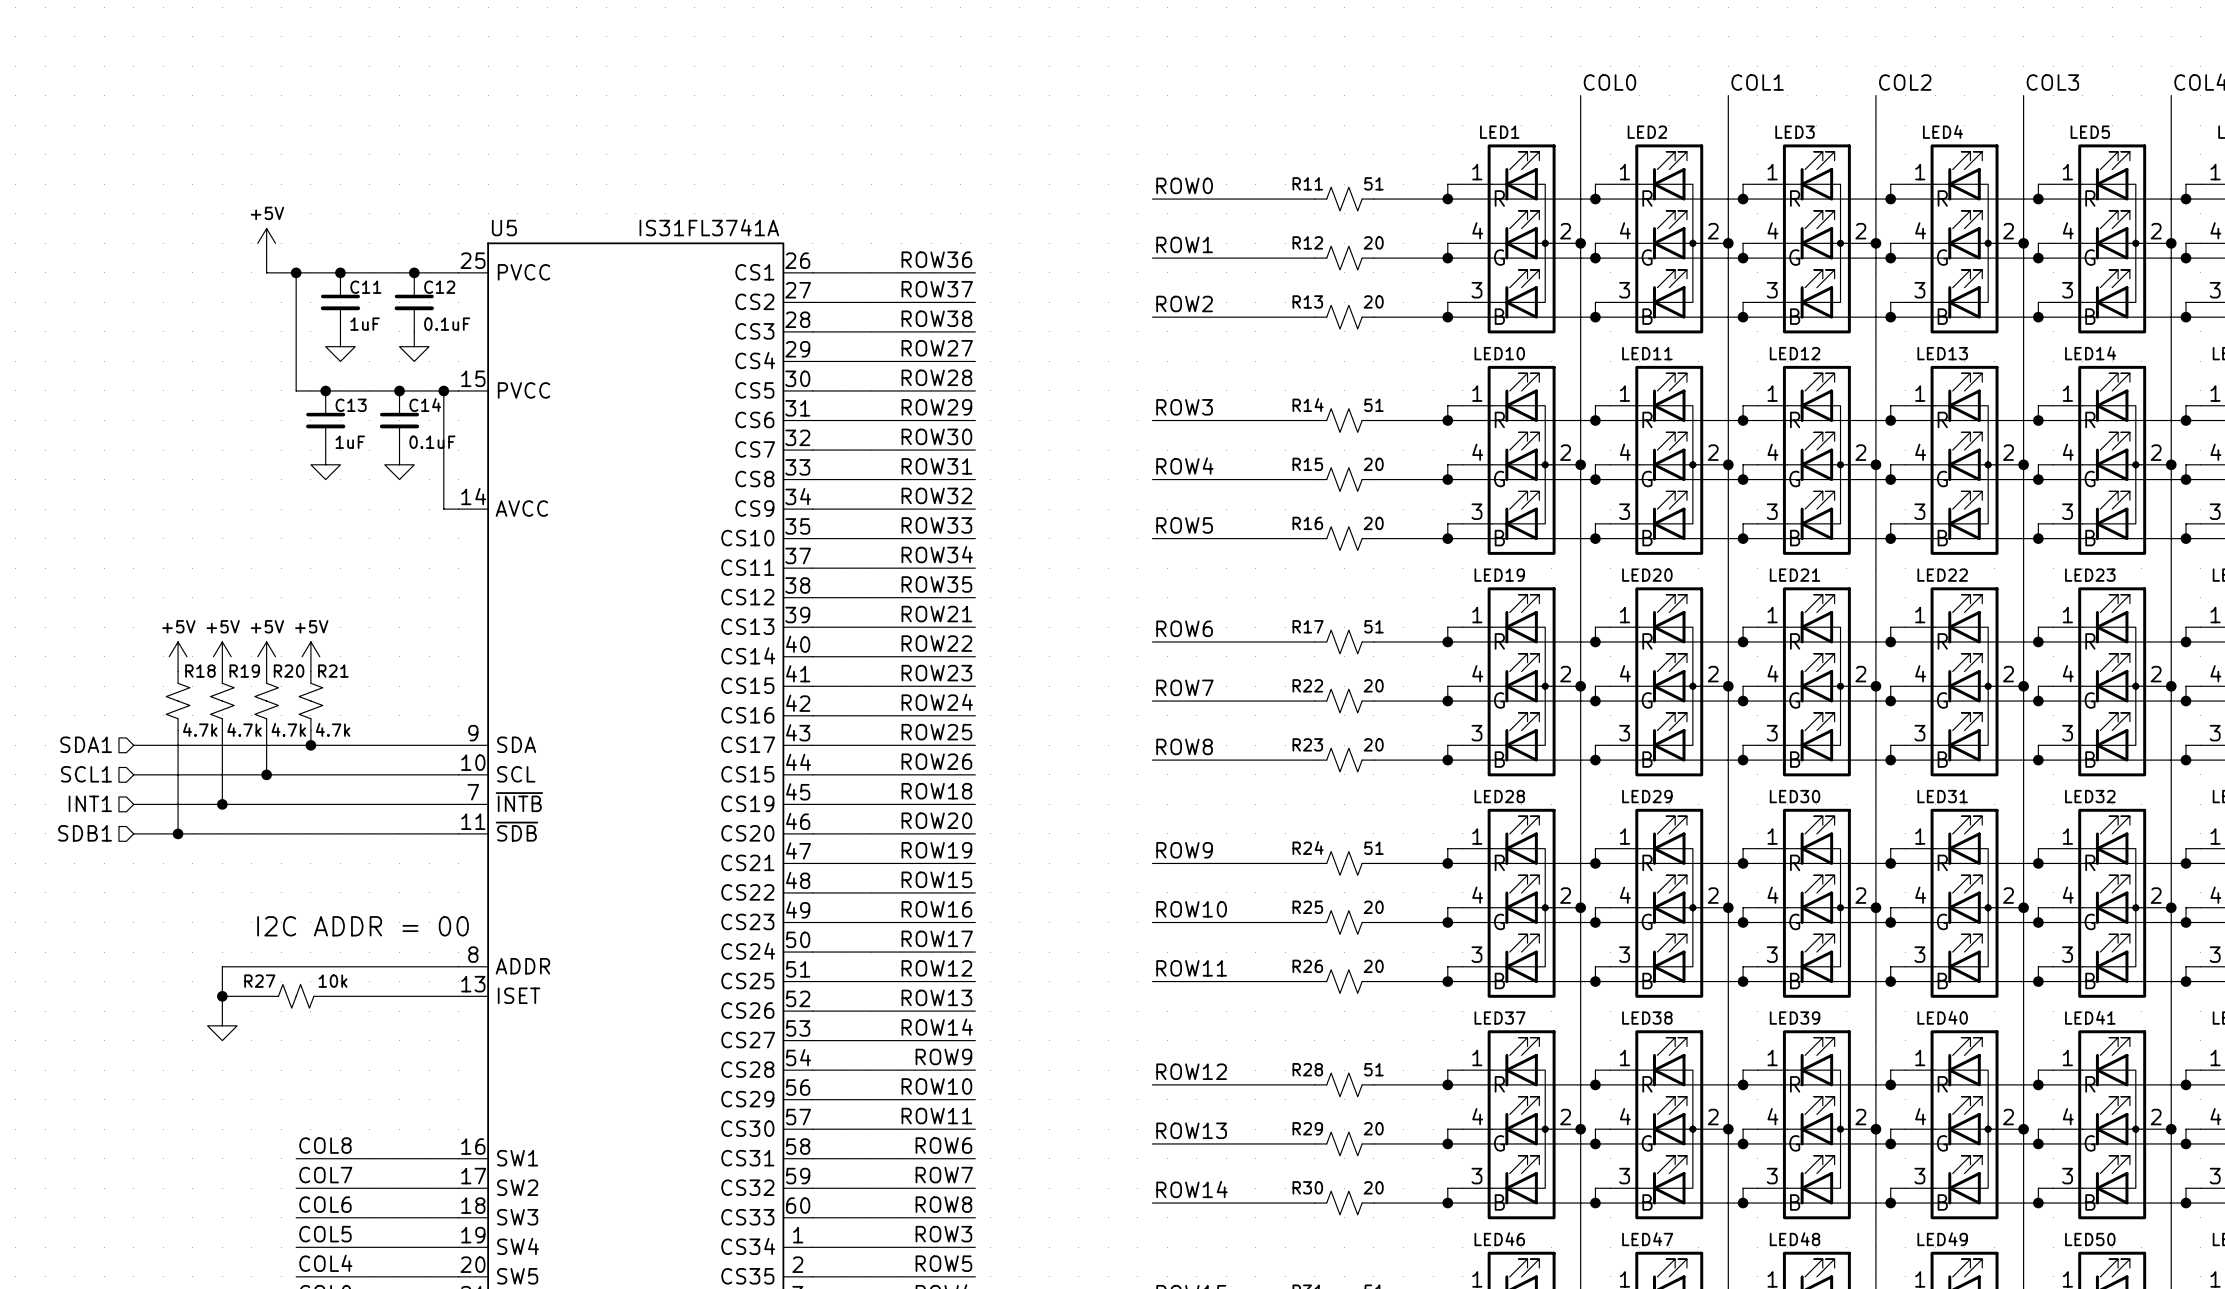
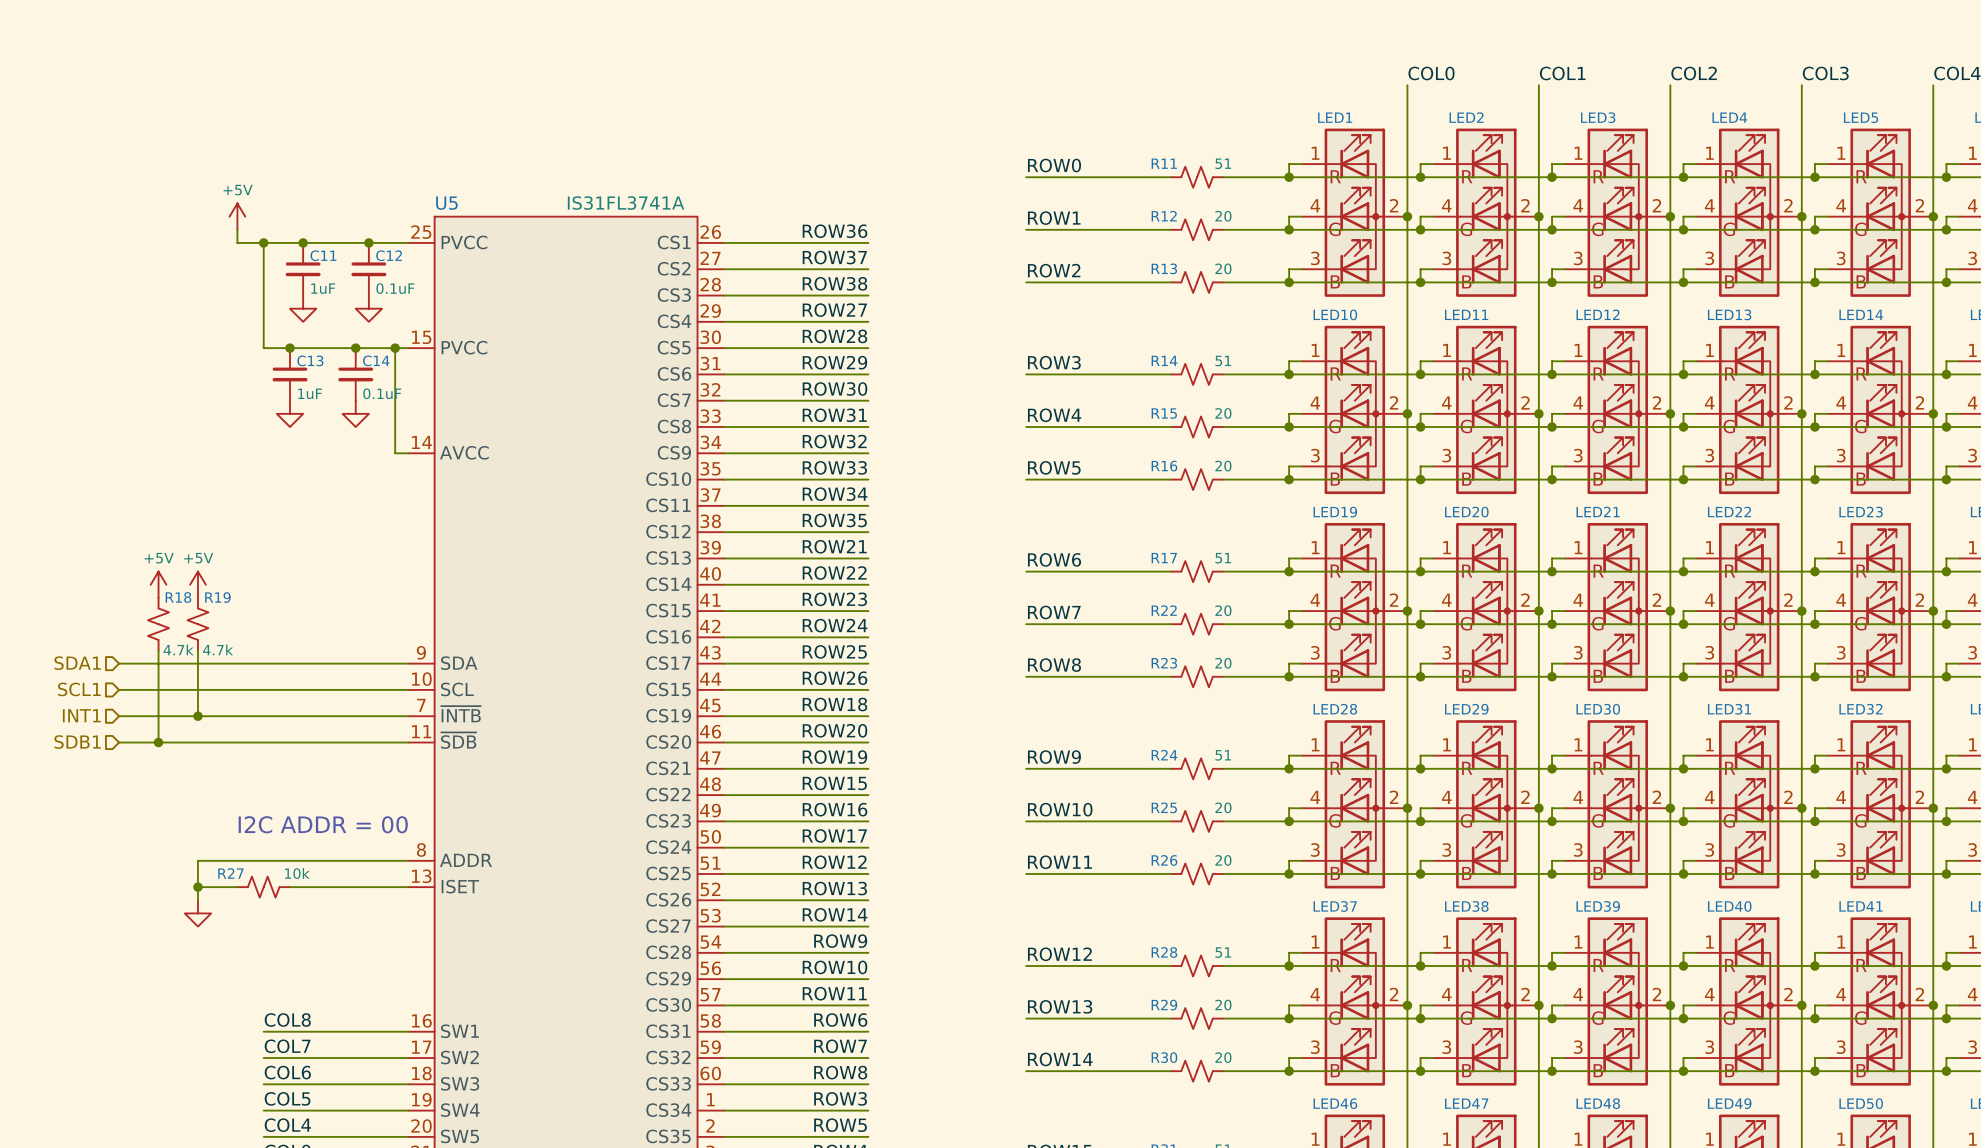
power symbol: +5V (266, 656) -> none
power symbol: +5V (310, 656) -> none
R20: 4.7k (266, 701) -> none
R21: 4.7k (310, 701) -> none
wire: (266, 730) (266, 774) -> none
wire: (310, 730) (310, 745) -> none
junction: (310, 745) -> none
junction: (266, 774) -> none

